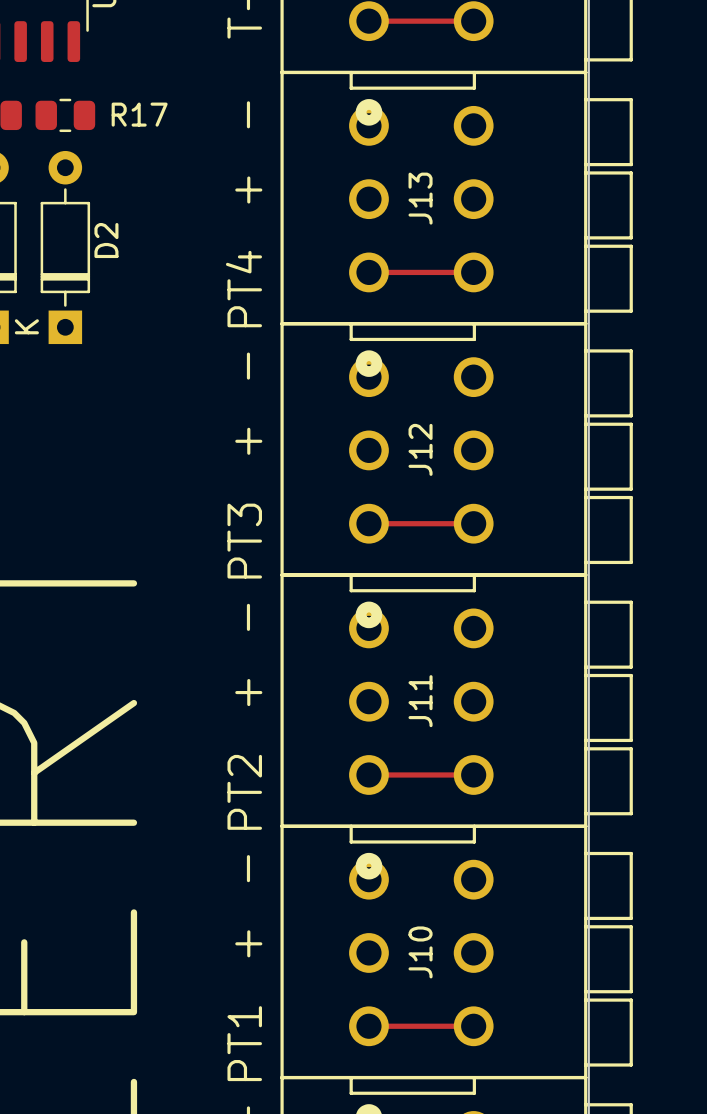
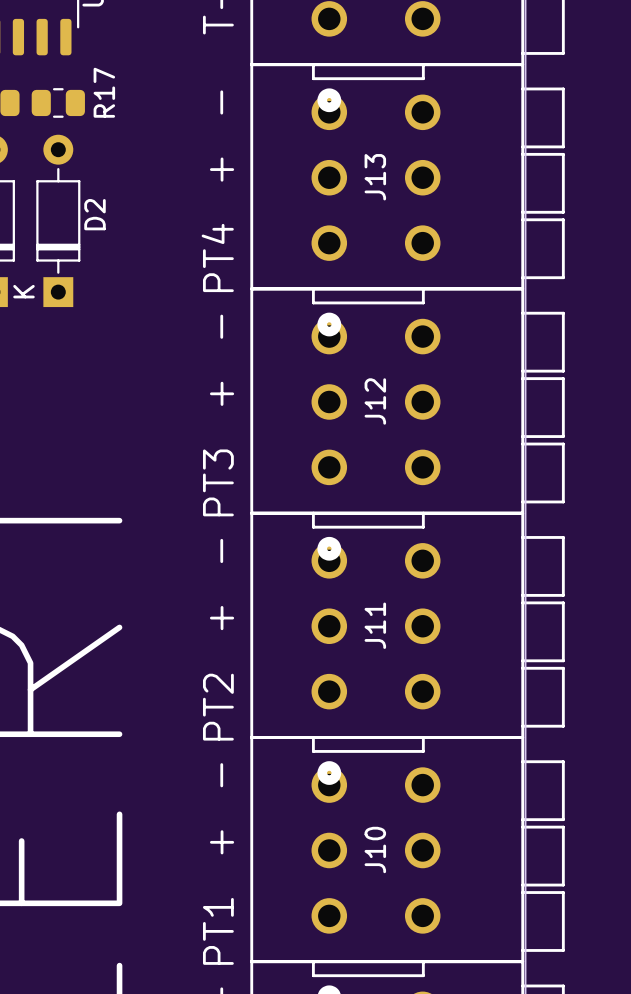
track: (368, 21) (473, 21) -> none
R17 name rotation: 0° (139, 114) -> 90° counterclockwise (104, 92)
track: (368, 272) (473, 272) -> none
track: (368, 523) (473, 523) -> none
track: (368, 774) (473, 774) -> none
track: (368, 1026) (473, 1026) -> none

